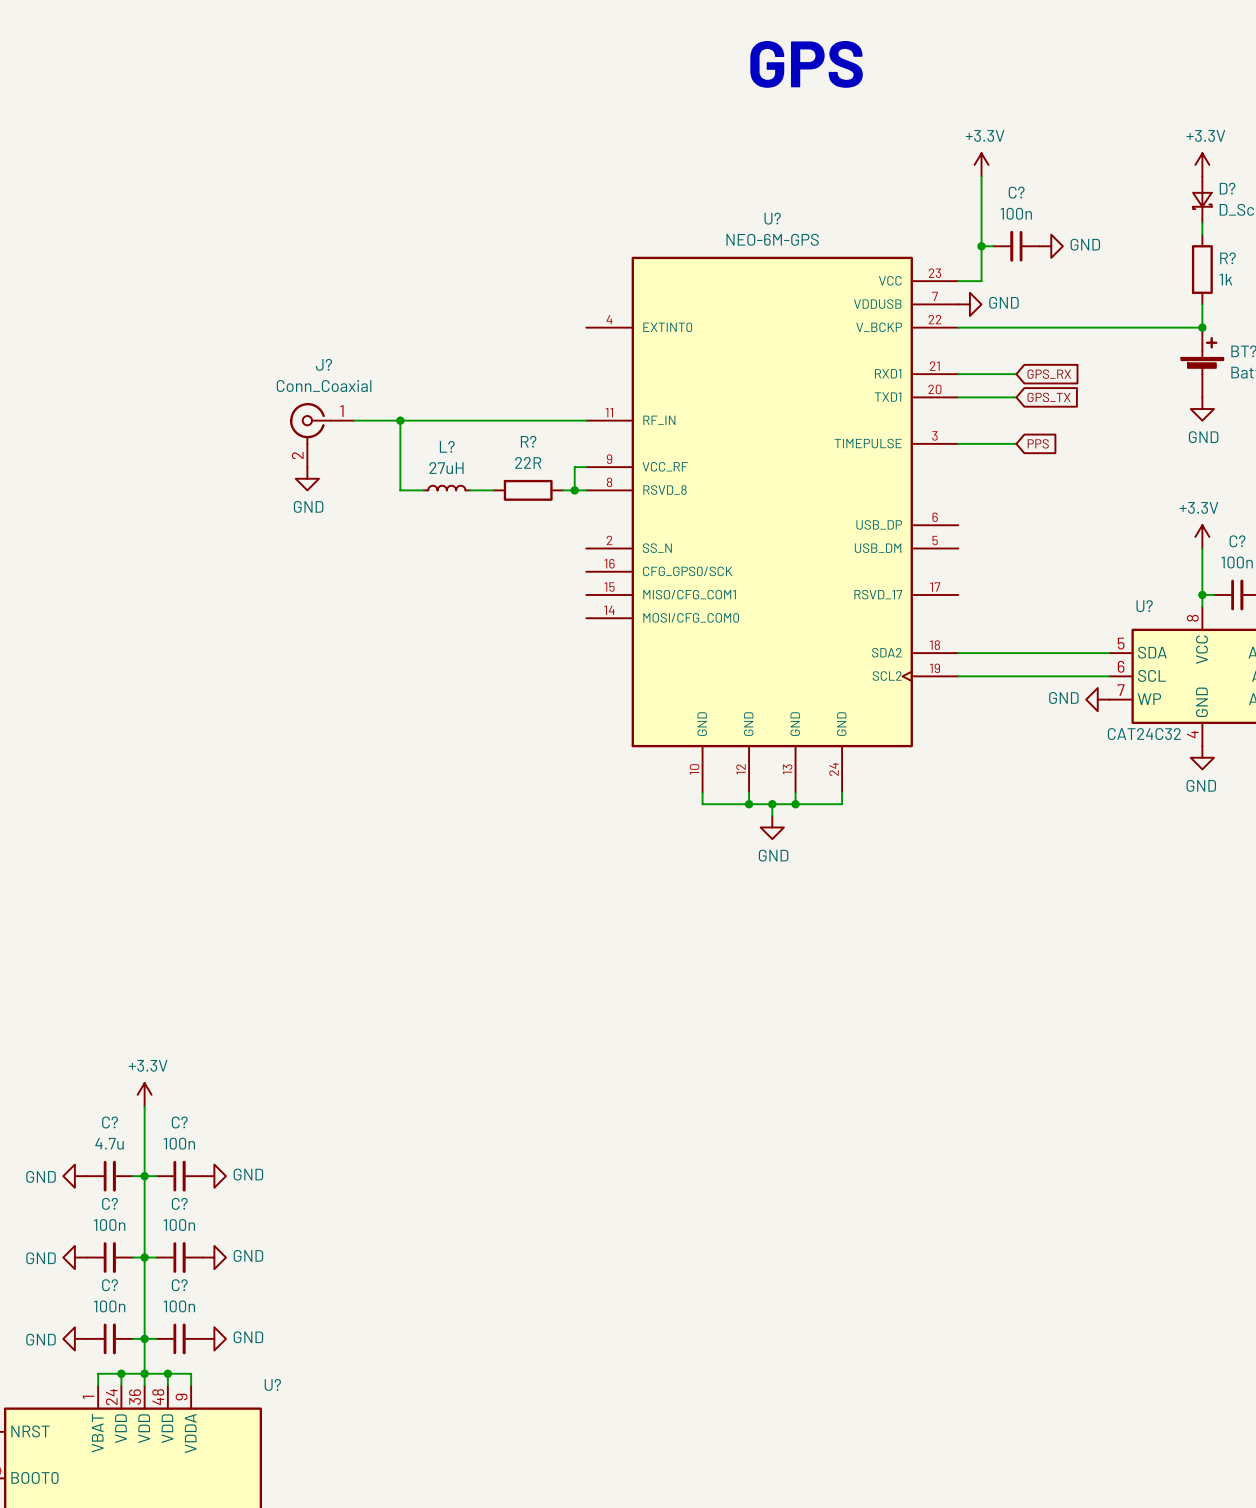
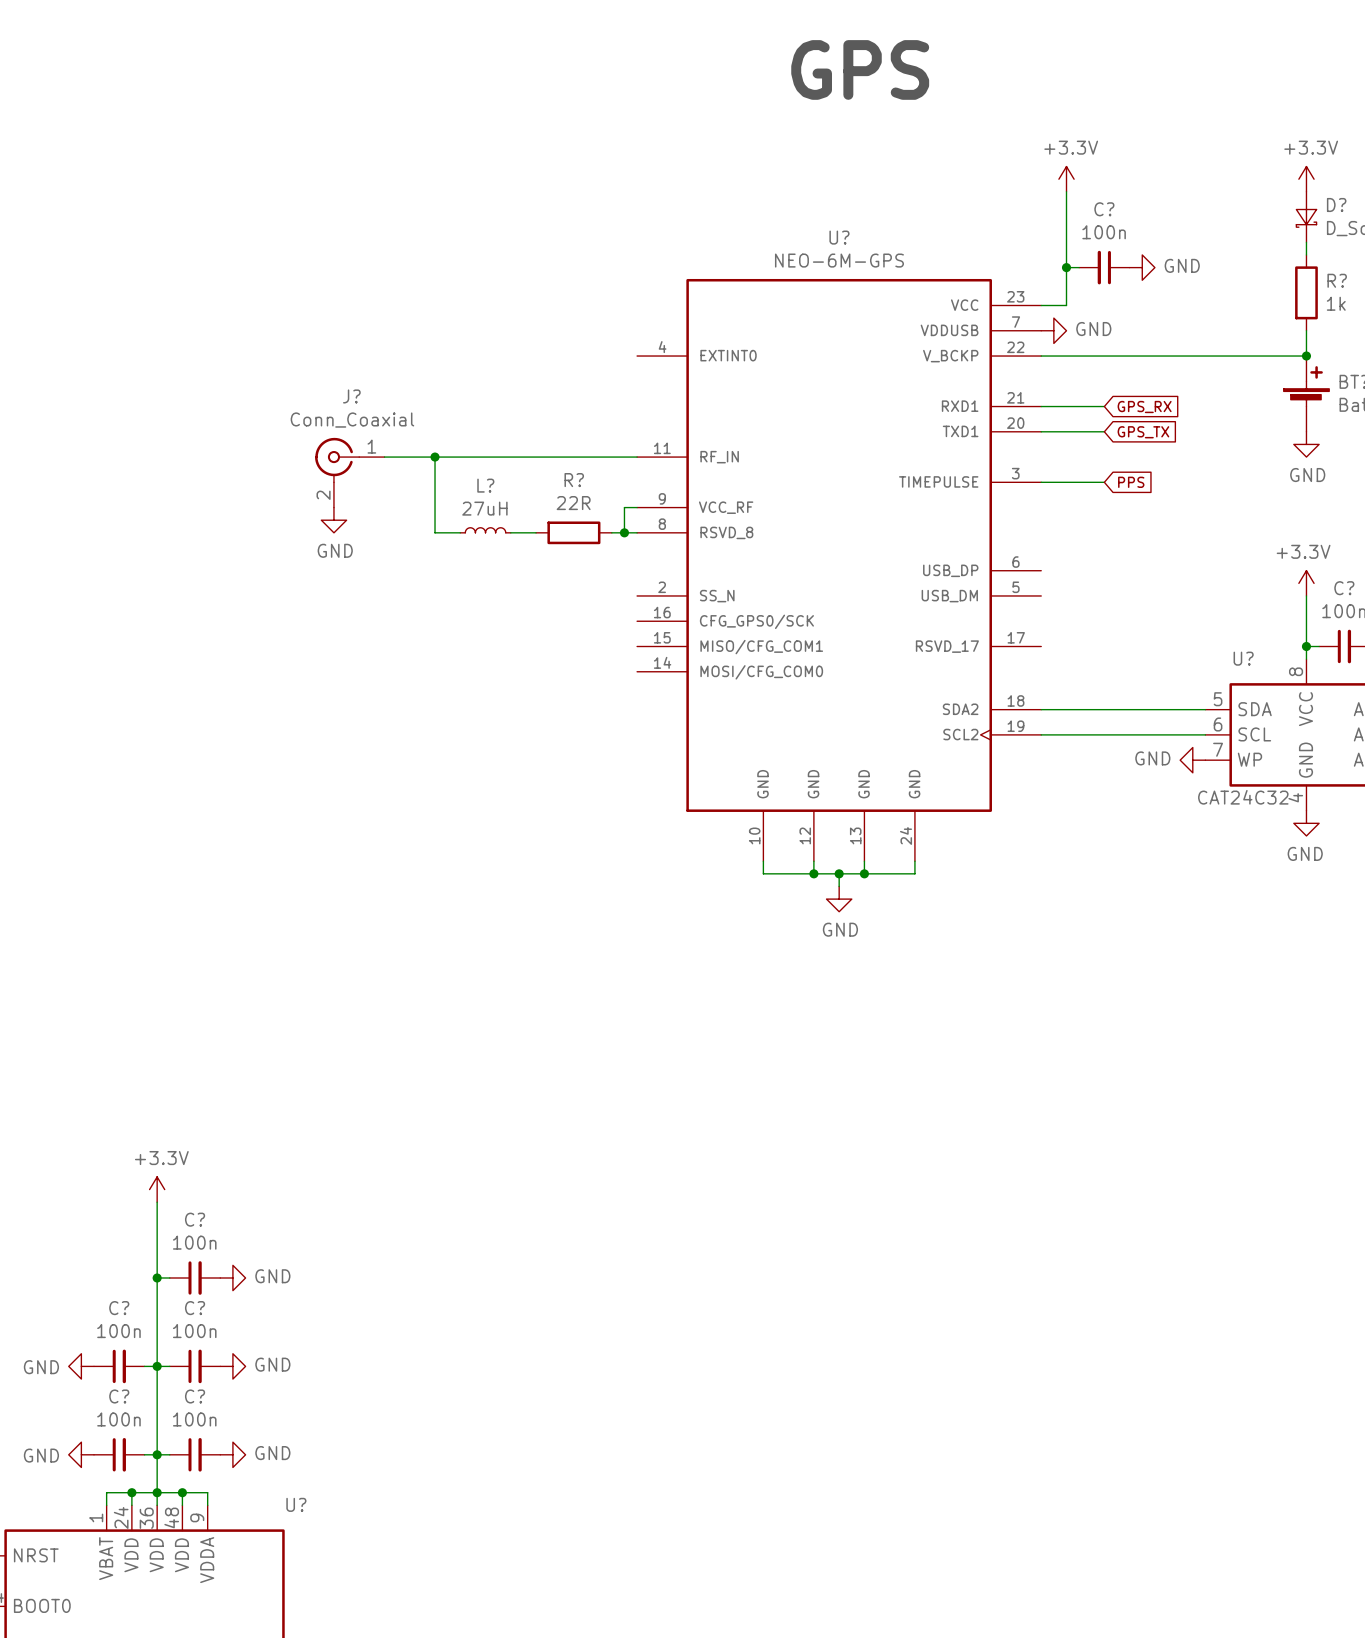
power symbol: GND (74, 1176) -> none
C?: 4.7u (109, 1176) -> none
wire: (133, 1176) (144, 1176) -> none

